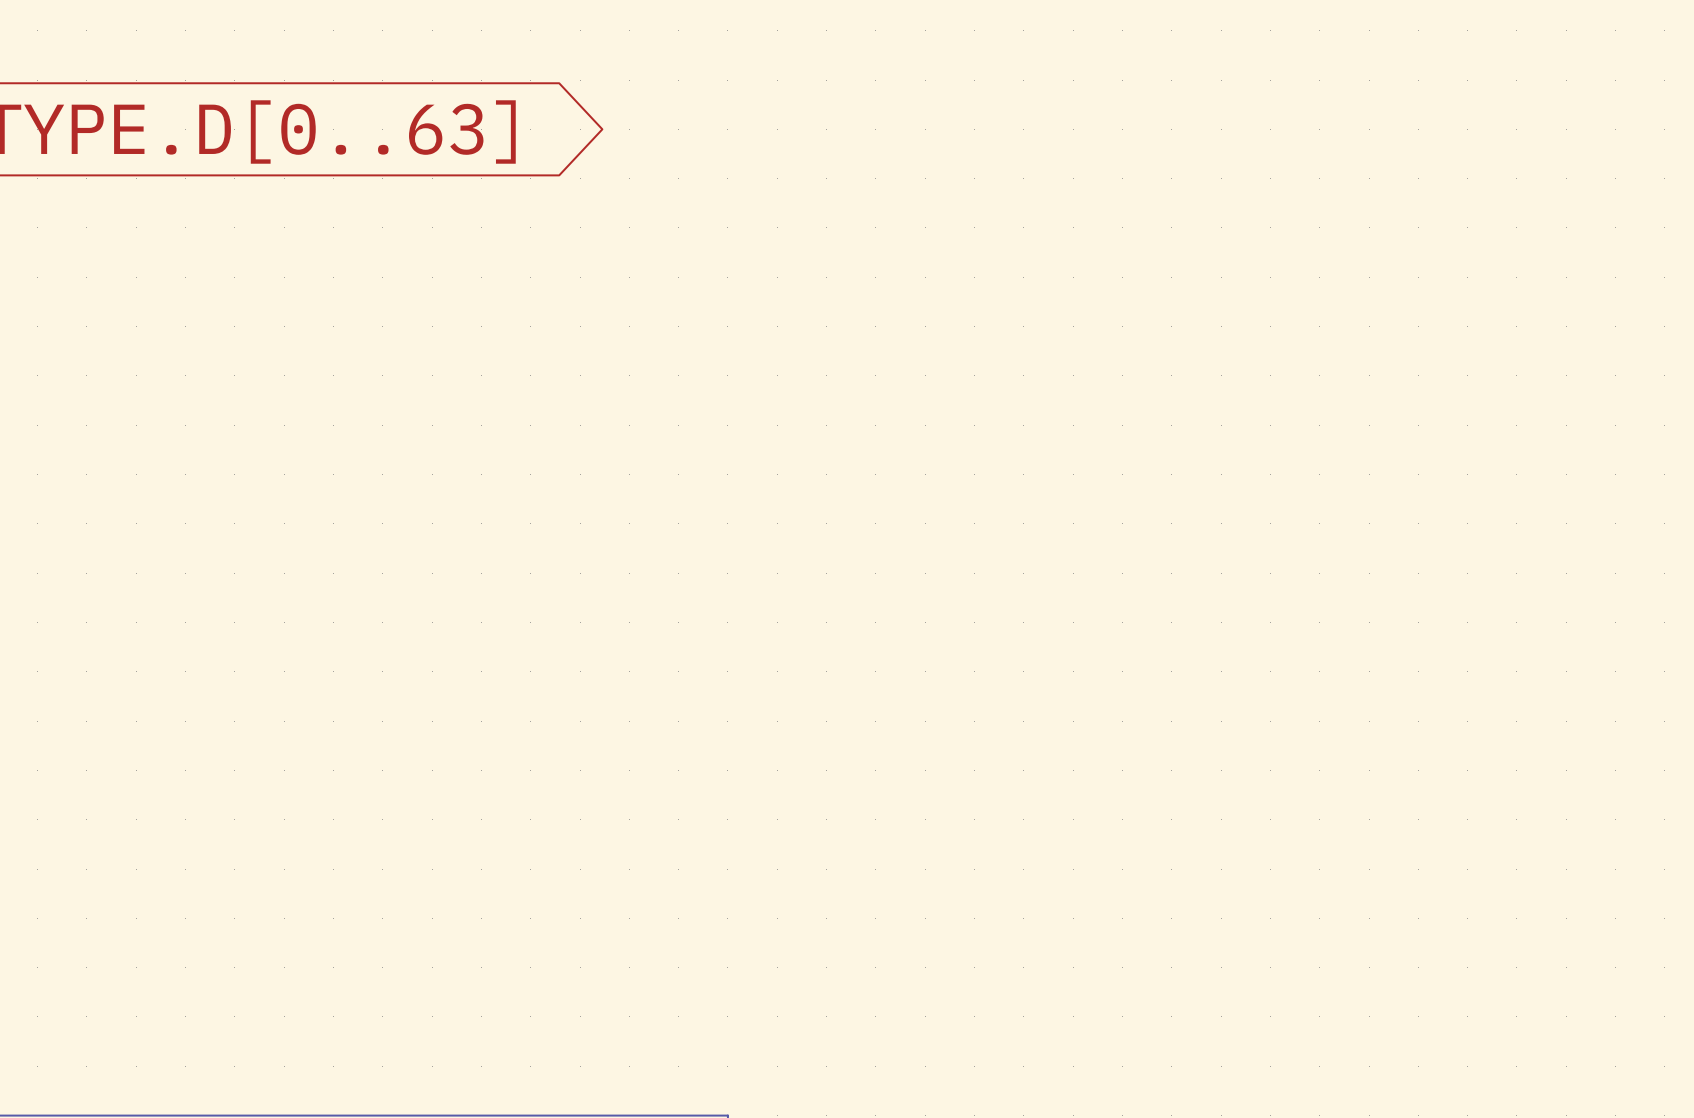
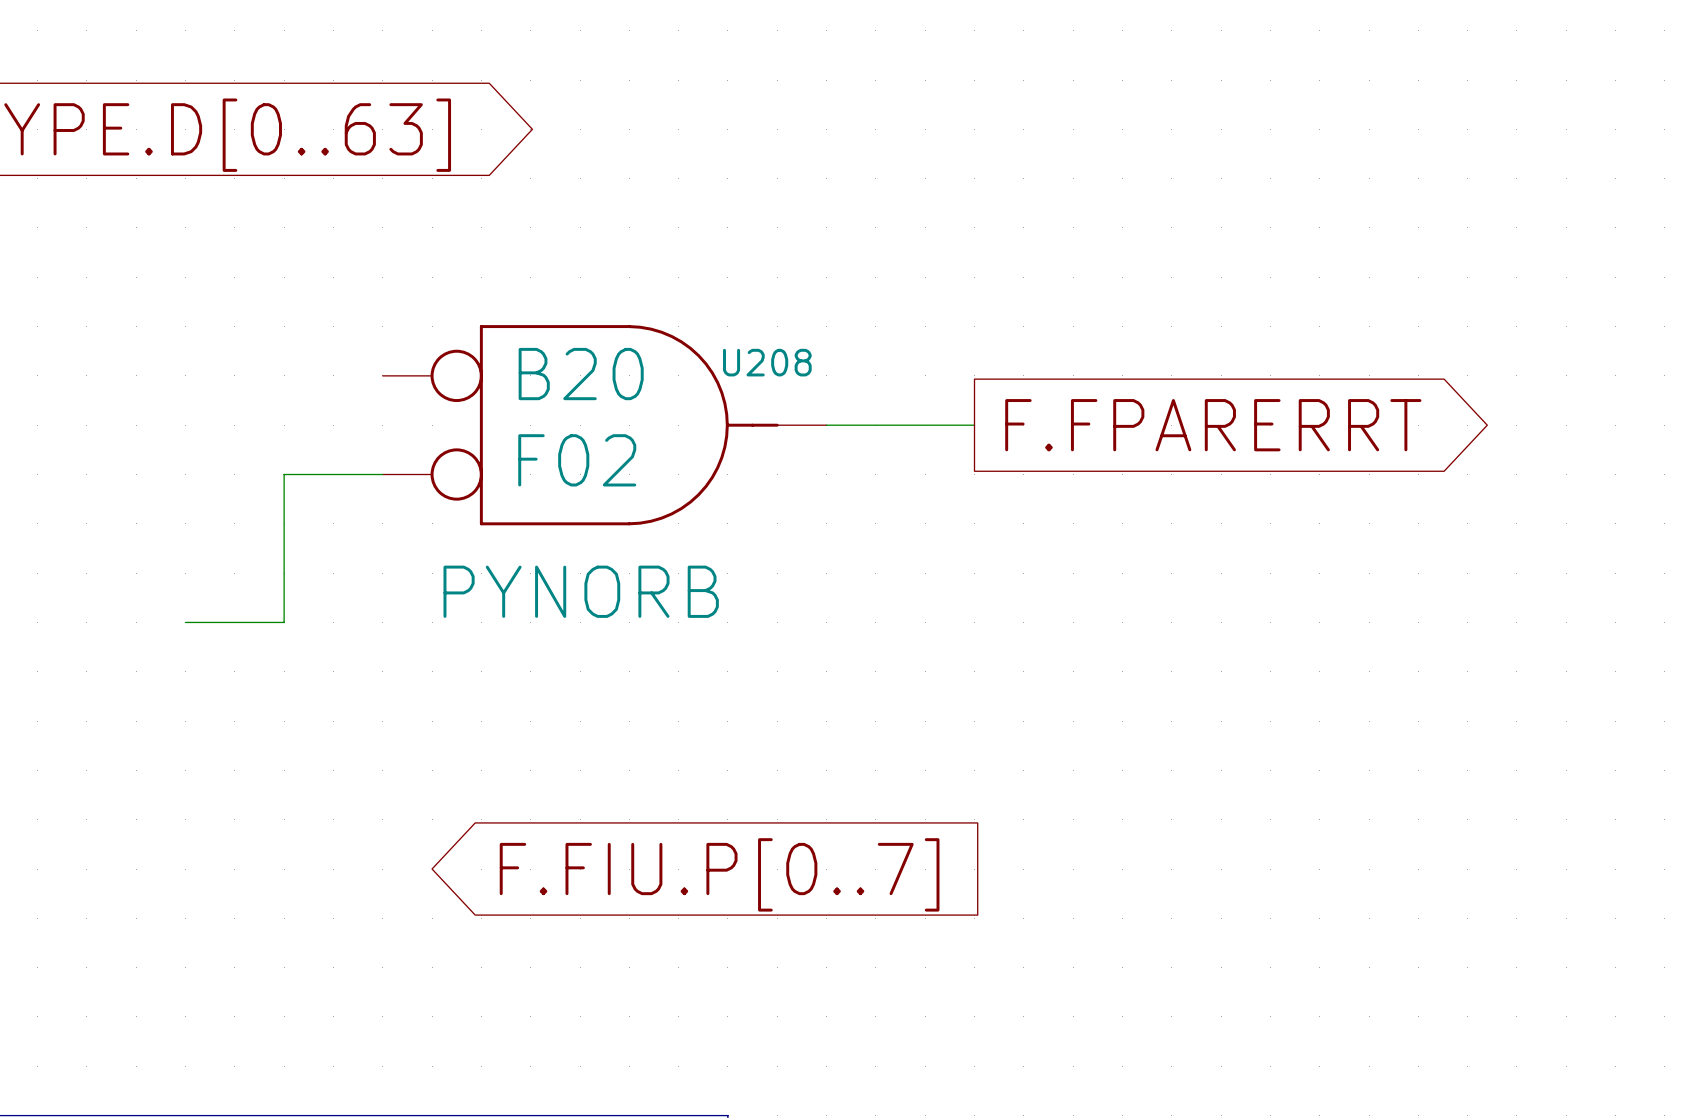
U208: none -> F02 (604, 425)
wire: none -> (826, 425) (974, 425)
global label: none -> F.FPARERRT (1213, 425)
wire: none -> (382, 474) (284, 474) (284, 622) (185, 622)
global label: none -> F.FIU.P[0..7] (719, 874)

